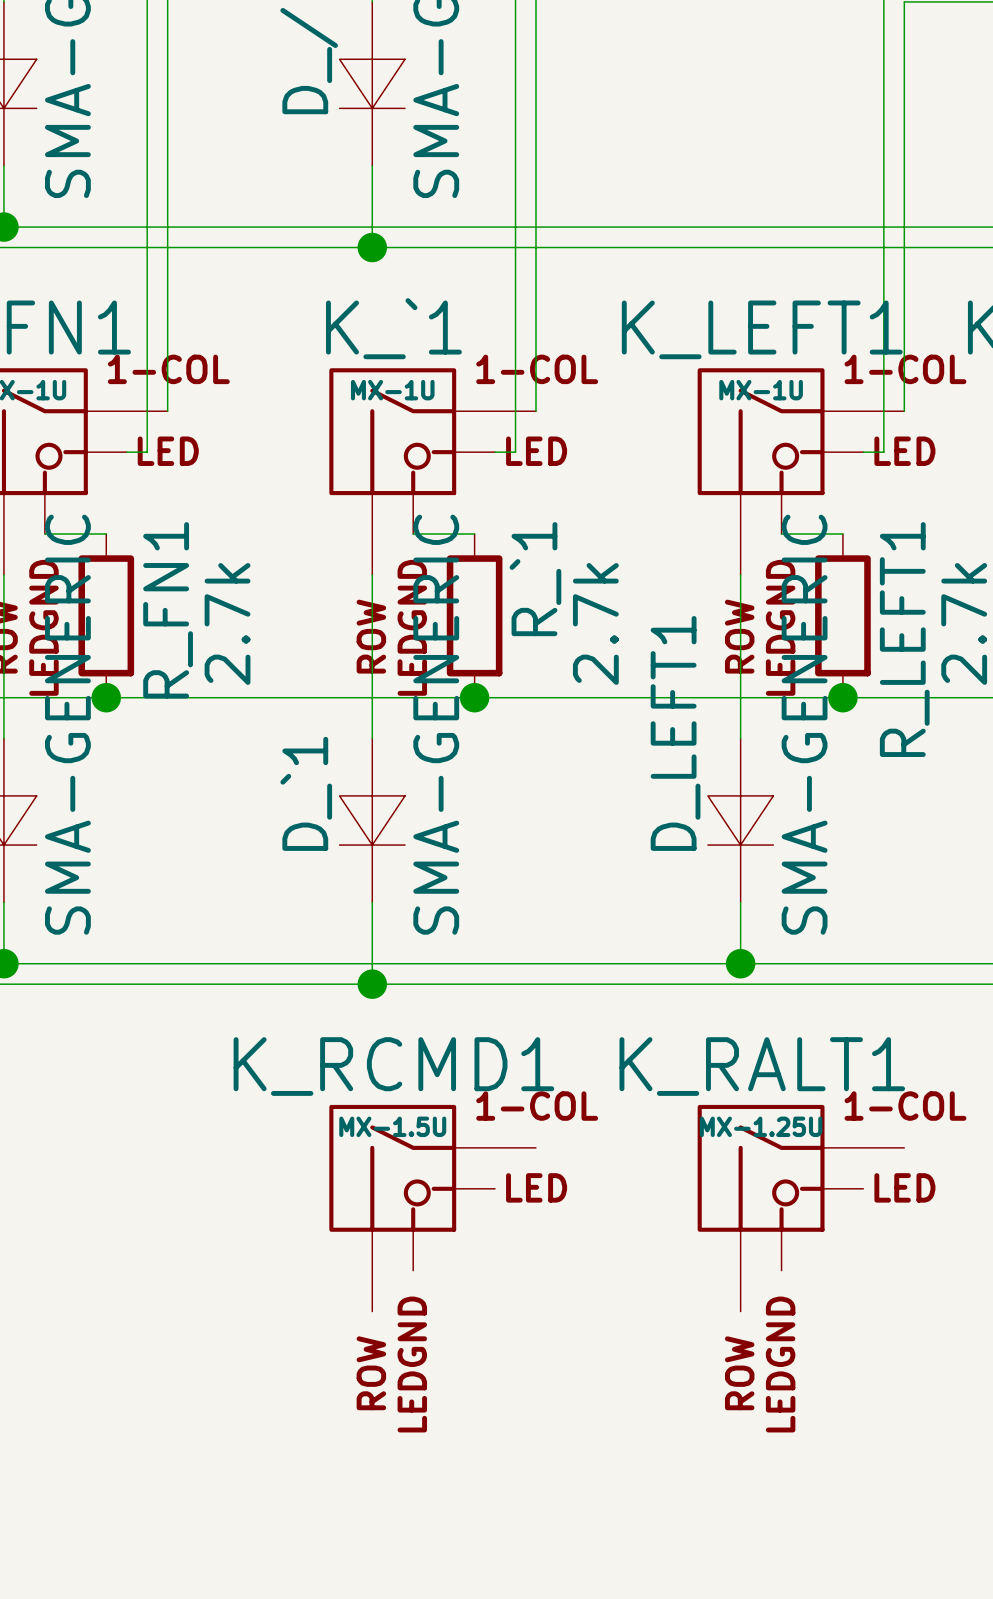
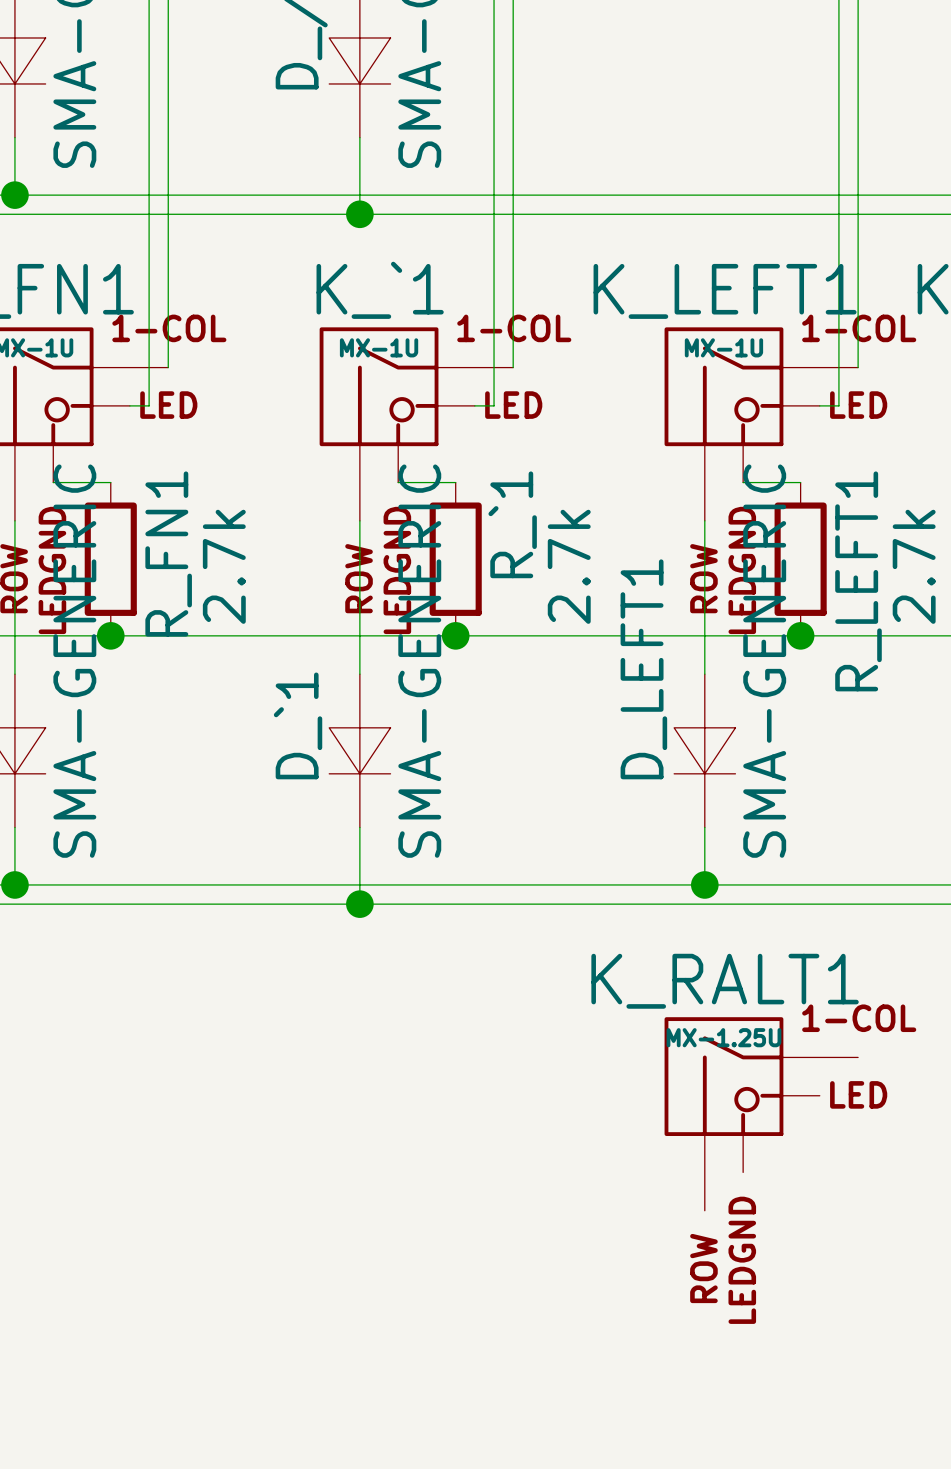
K_RCMD1: MX-1.5U (432, 1208) -> none

